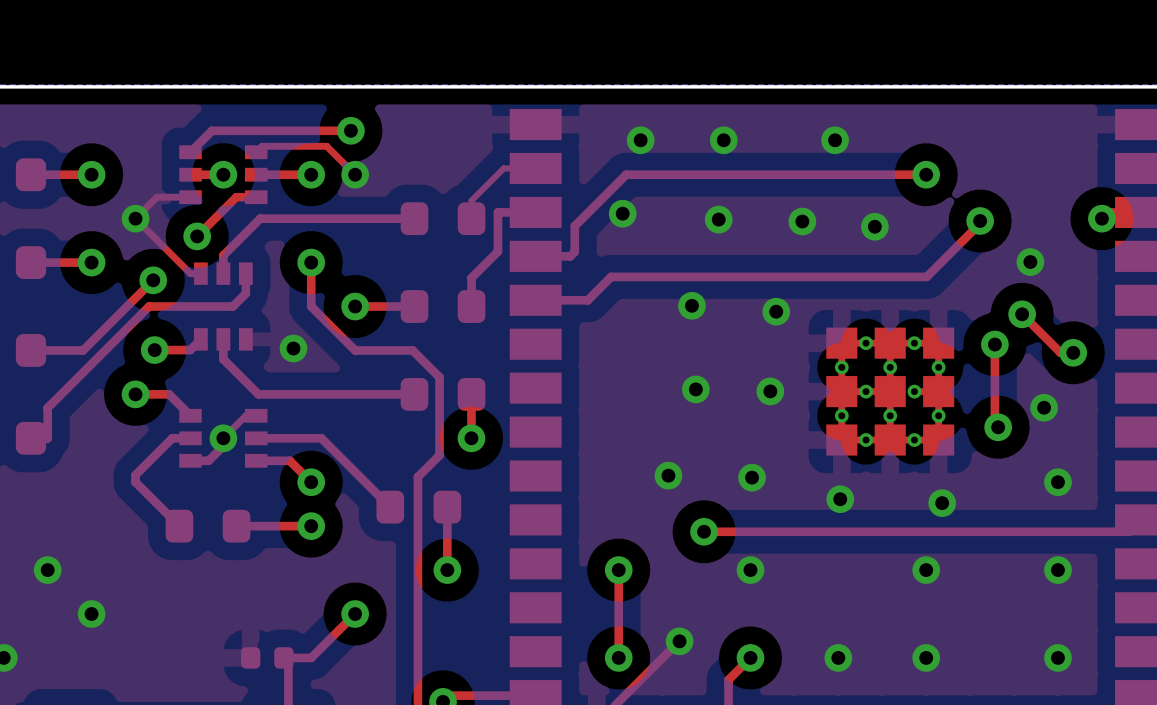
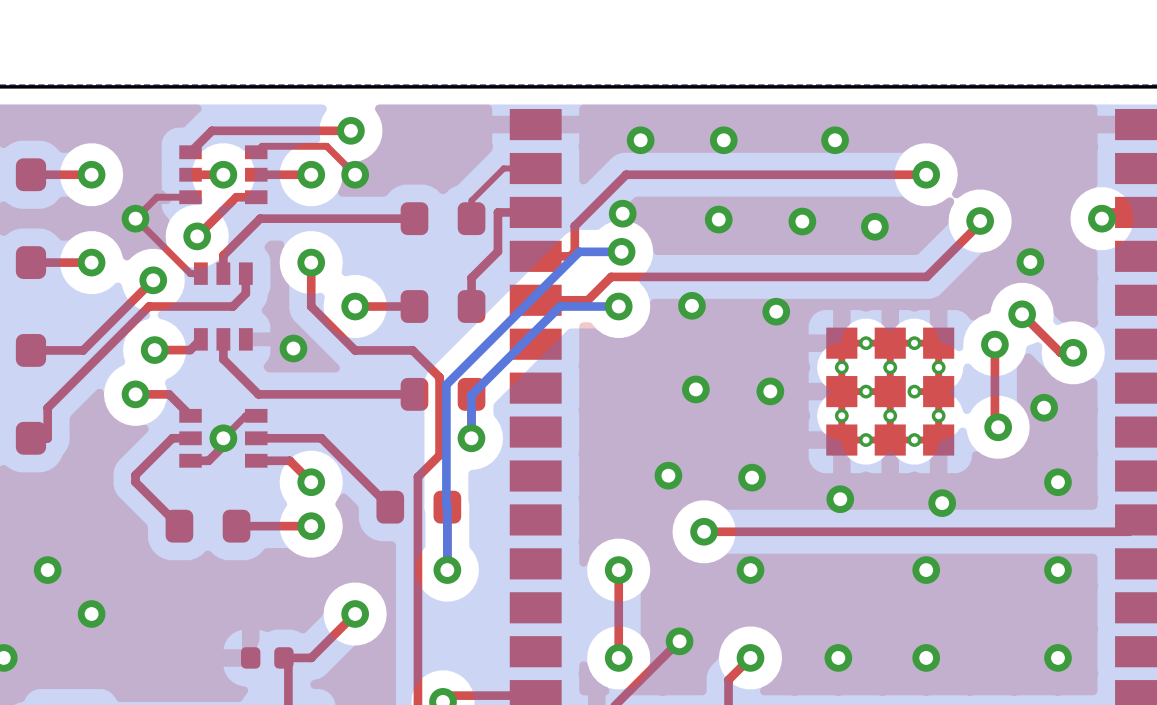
bottom track: none -> (621, 251) (579, 251) (446, 384) (447, 570)
via: none -> (621, 251)
bottom track: none -> (618, 306) (560, 306) (471, 395) (471, 438)
via: none -> (618, 306)

